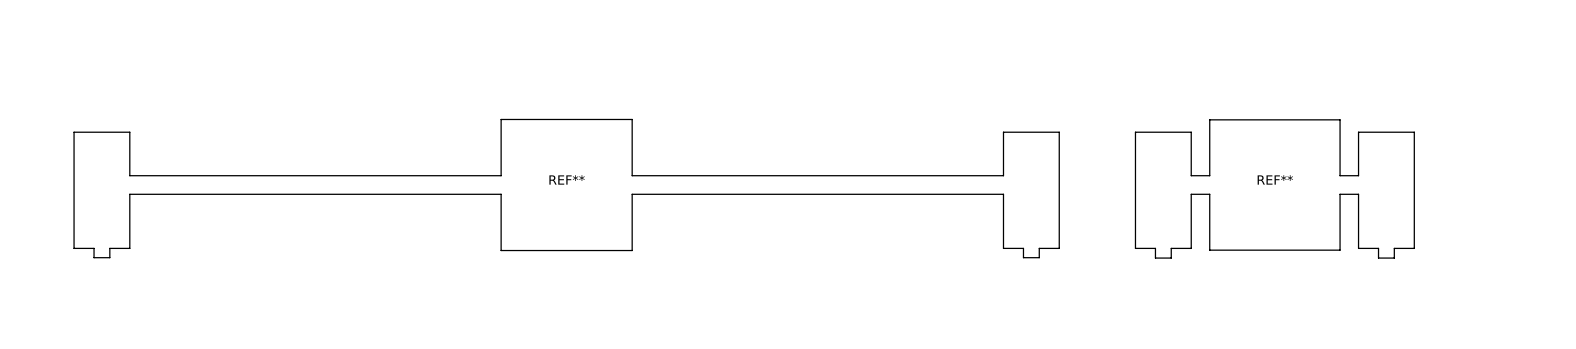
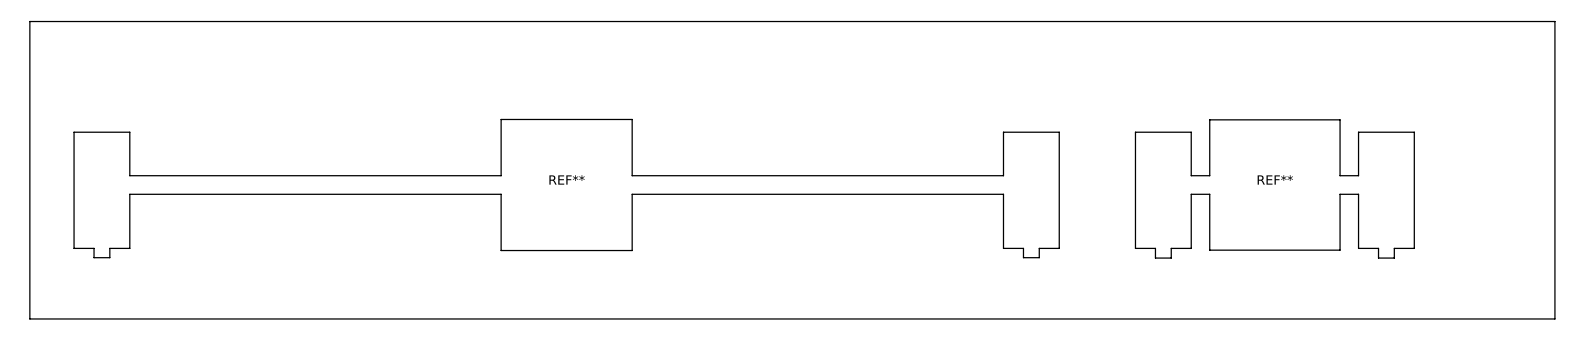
board edge: none -> (29, 21) (1554, 21) (1554, 318) (29, 318) (29, 21)

